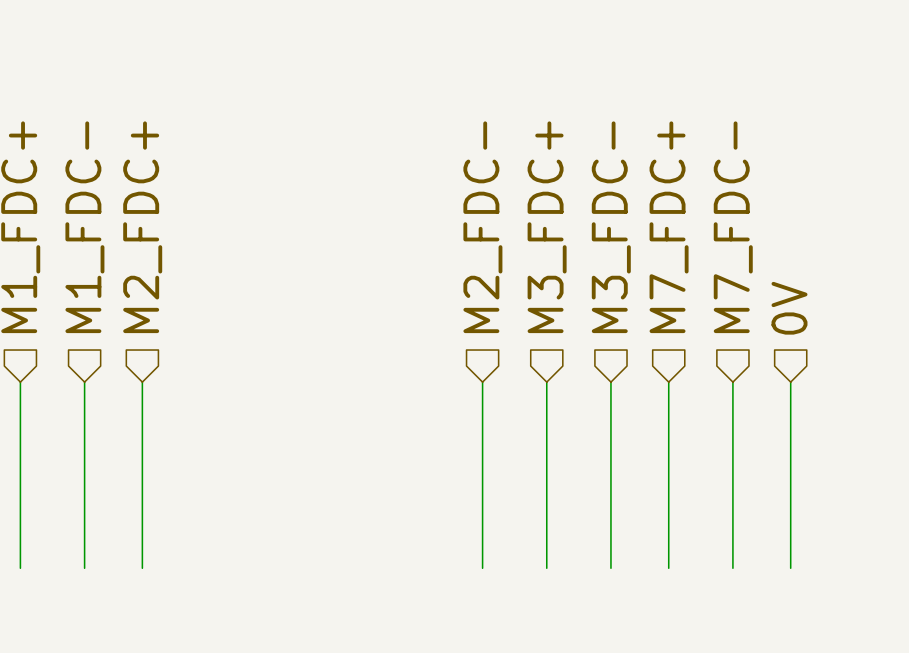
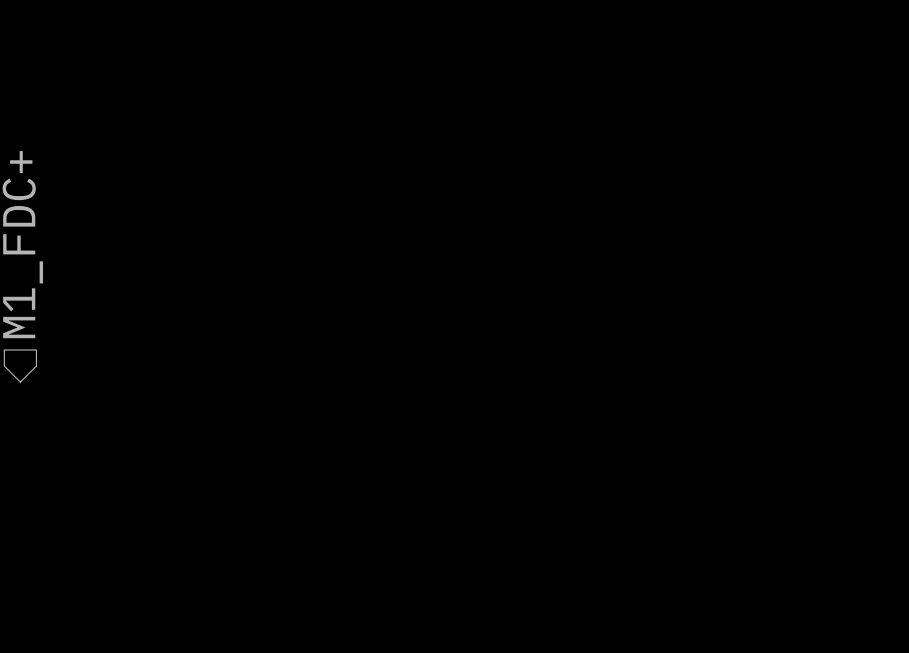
hierarchical label: M1_FDC- (84, 227) -> none
hierarchical label: M2_FDC+ (142, 227) -> none
hierarchical label: M2_FDC- (482, 227) -> none
hierarchical label: M3_FDC+ (547, 227) -> none
hierarchical label: M3_FDC- (611, 227) -> none
hierarchical label: M7_FDC+ (669, 227) -> none
hierarchical label: M7_FDC- (733, 227) -> none
hierarchical label: 0V (789, 308) -> none
wire: (20, 382) (20, 568) -> none
wire: (84, 382) (84, 568) -> none
wire: (142, 382) (142, 568) -> none
wire: (482, 382) (482, 568) -> none
wire: (546, 382) (546, 568) -> none
wire: (610, 382) (610, 568) -> none
wire: (668, 382) (668, 568) -> none
wire: (732, 382) (732, 568) -> none
wire: (790, 382) (790, 568) -> none

